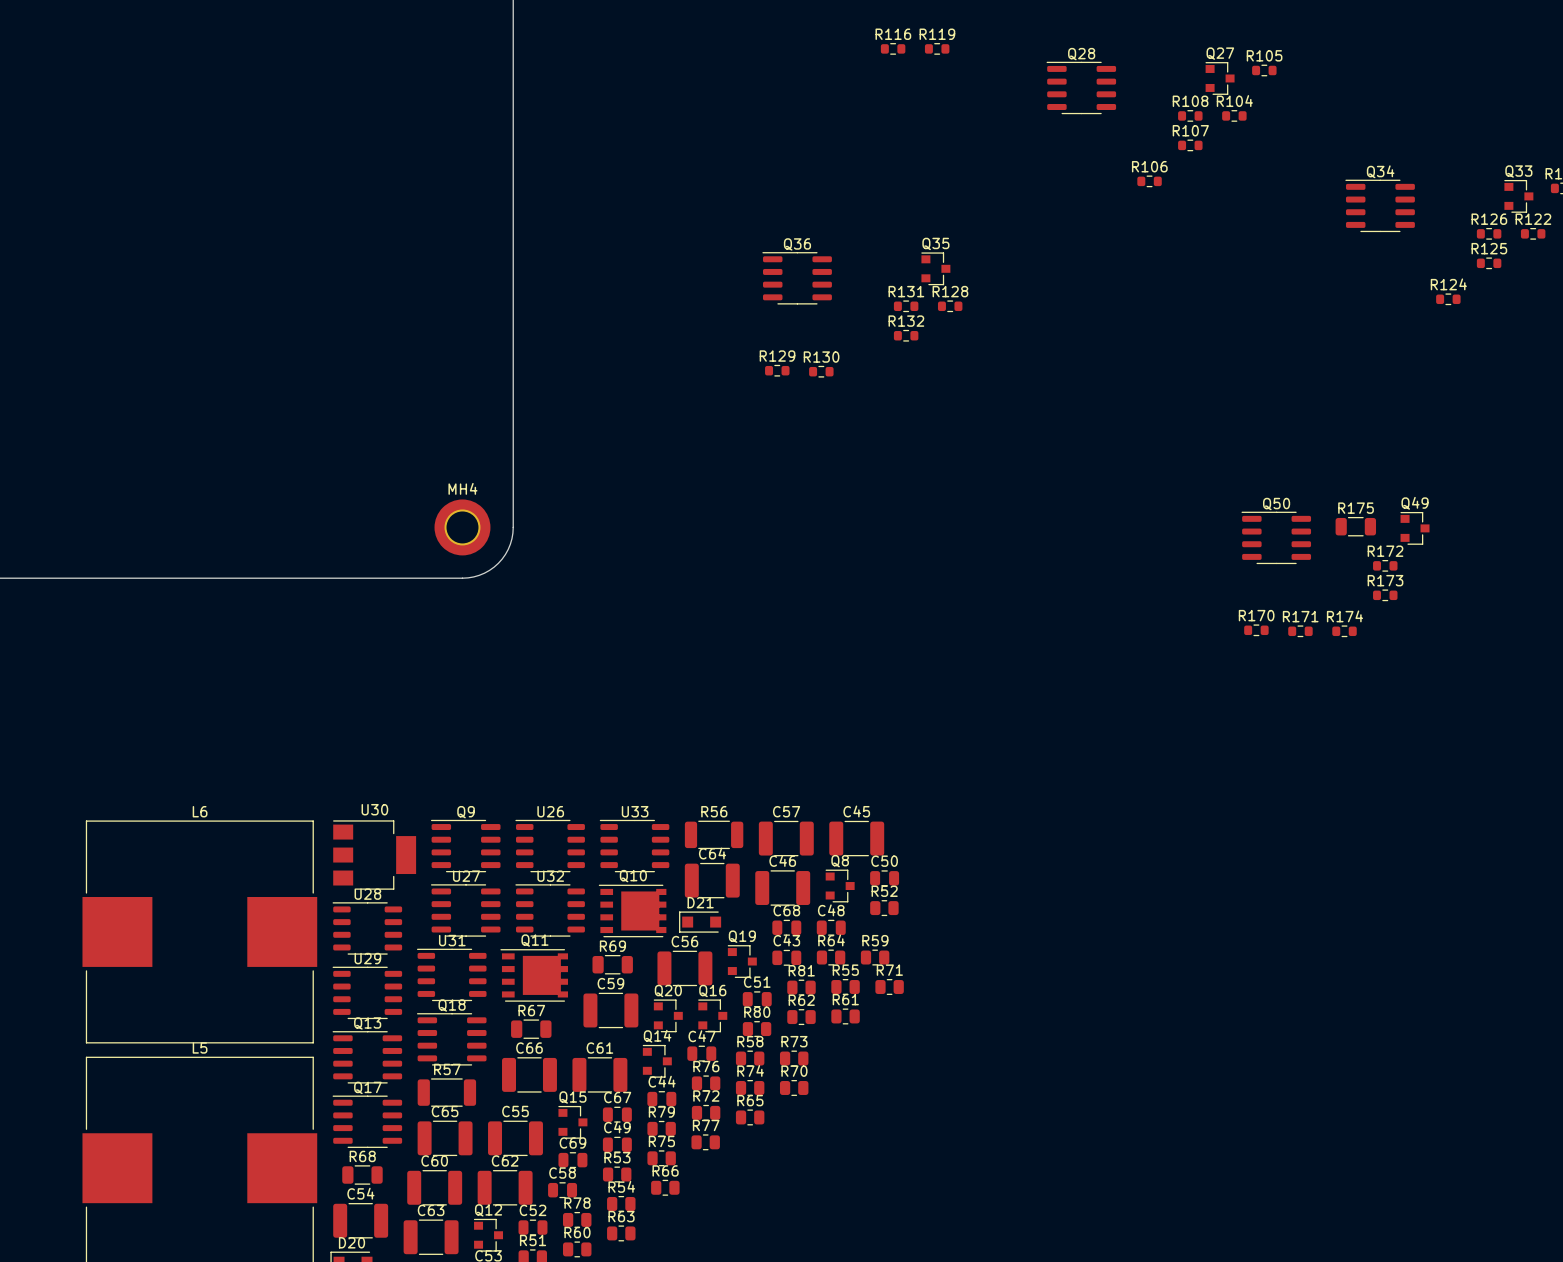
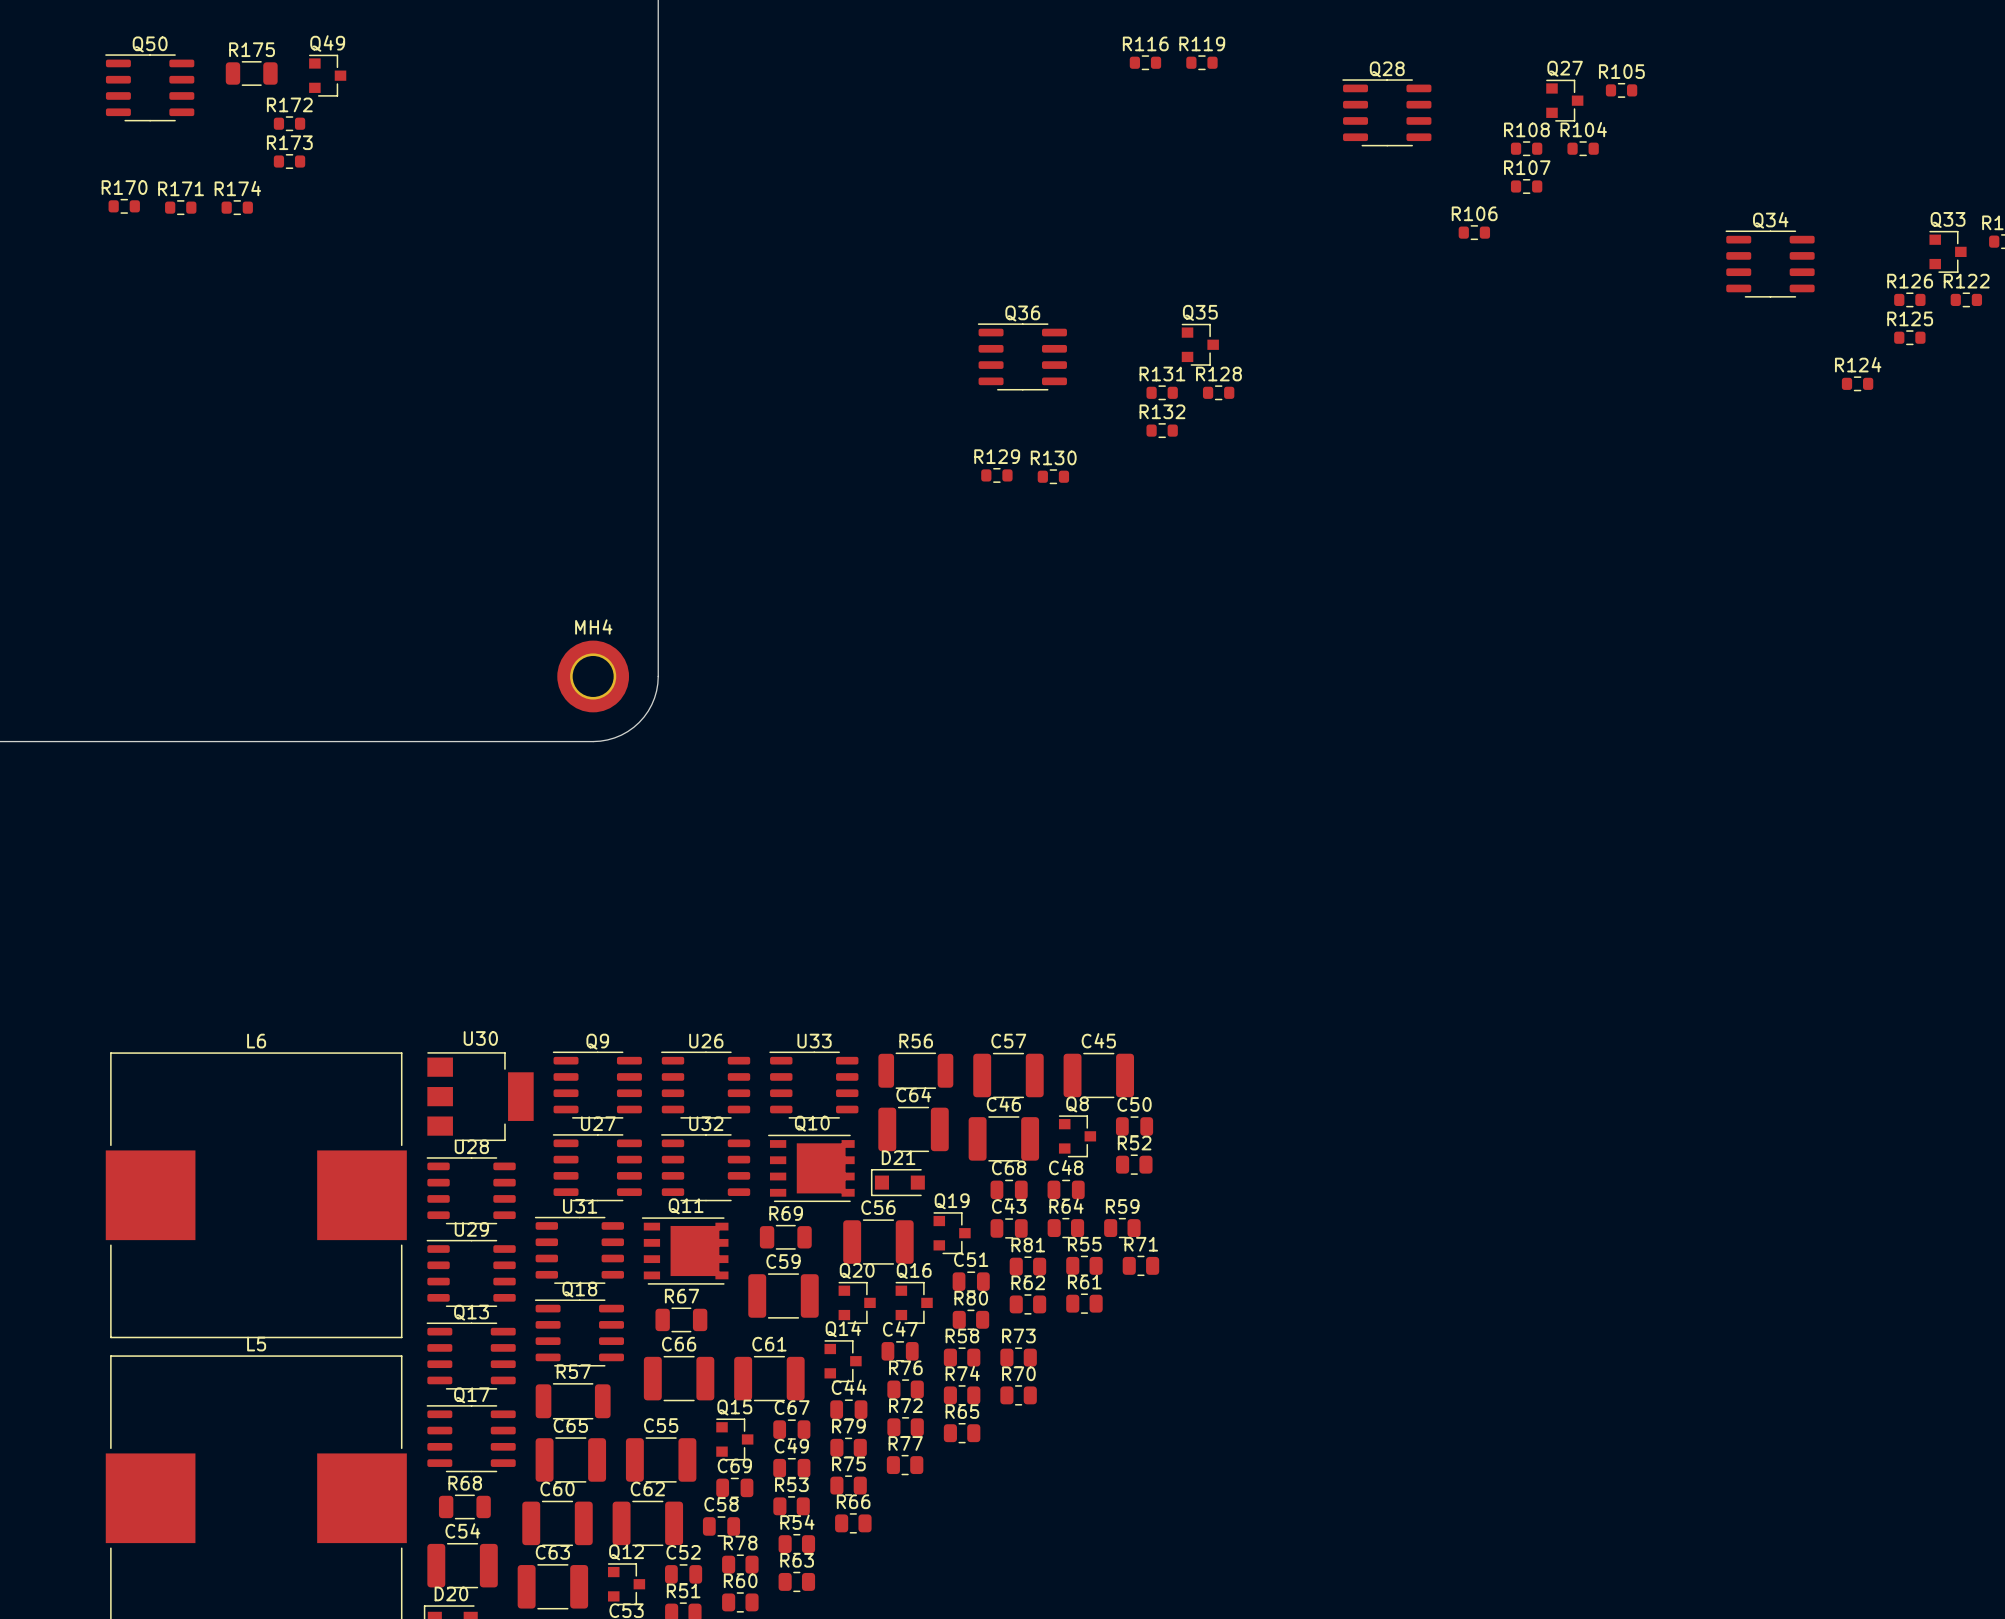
R175 position: (1355, 526) -> (251, 73)
Q49 position: (1414, 528) -> (327, 75)
Q50 position: (1276, 537) -> (149, 87)
R172 position: (1385, 565) -> (289, 123)
R173 position: (1385, 595) -> (289, 161)
R170 position: (1256, 630) -> (124, 206)
R171 position: (1300, 631) -> (180, 207)
R174 position: (1344, 631) -> (237, 207)

